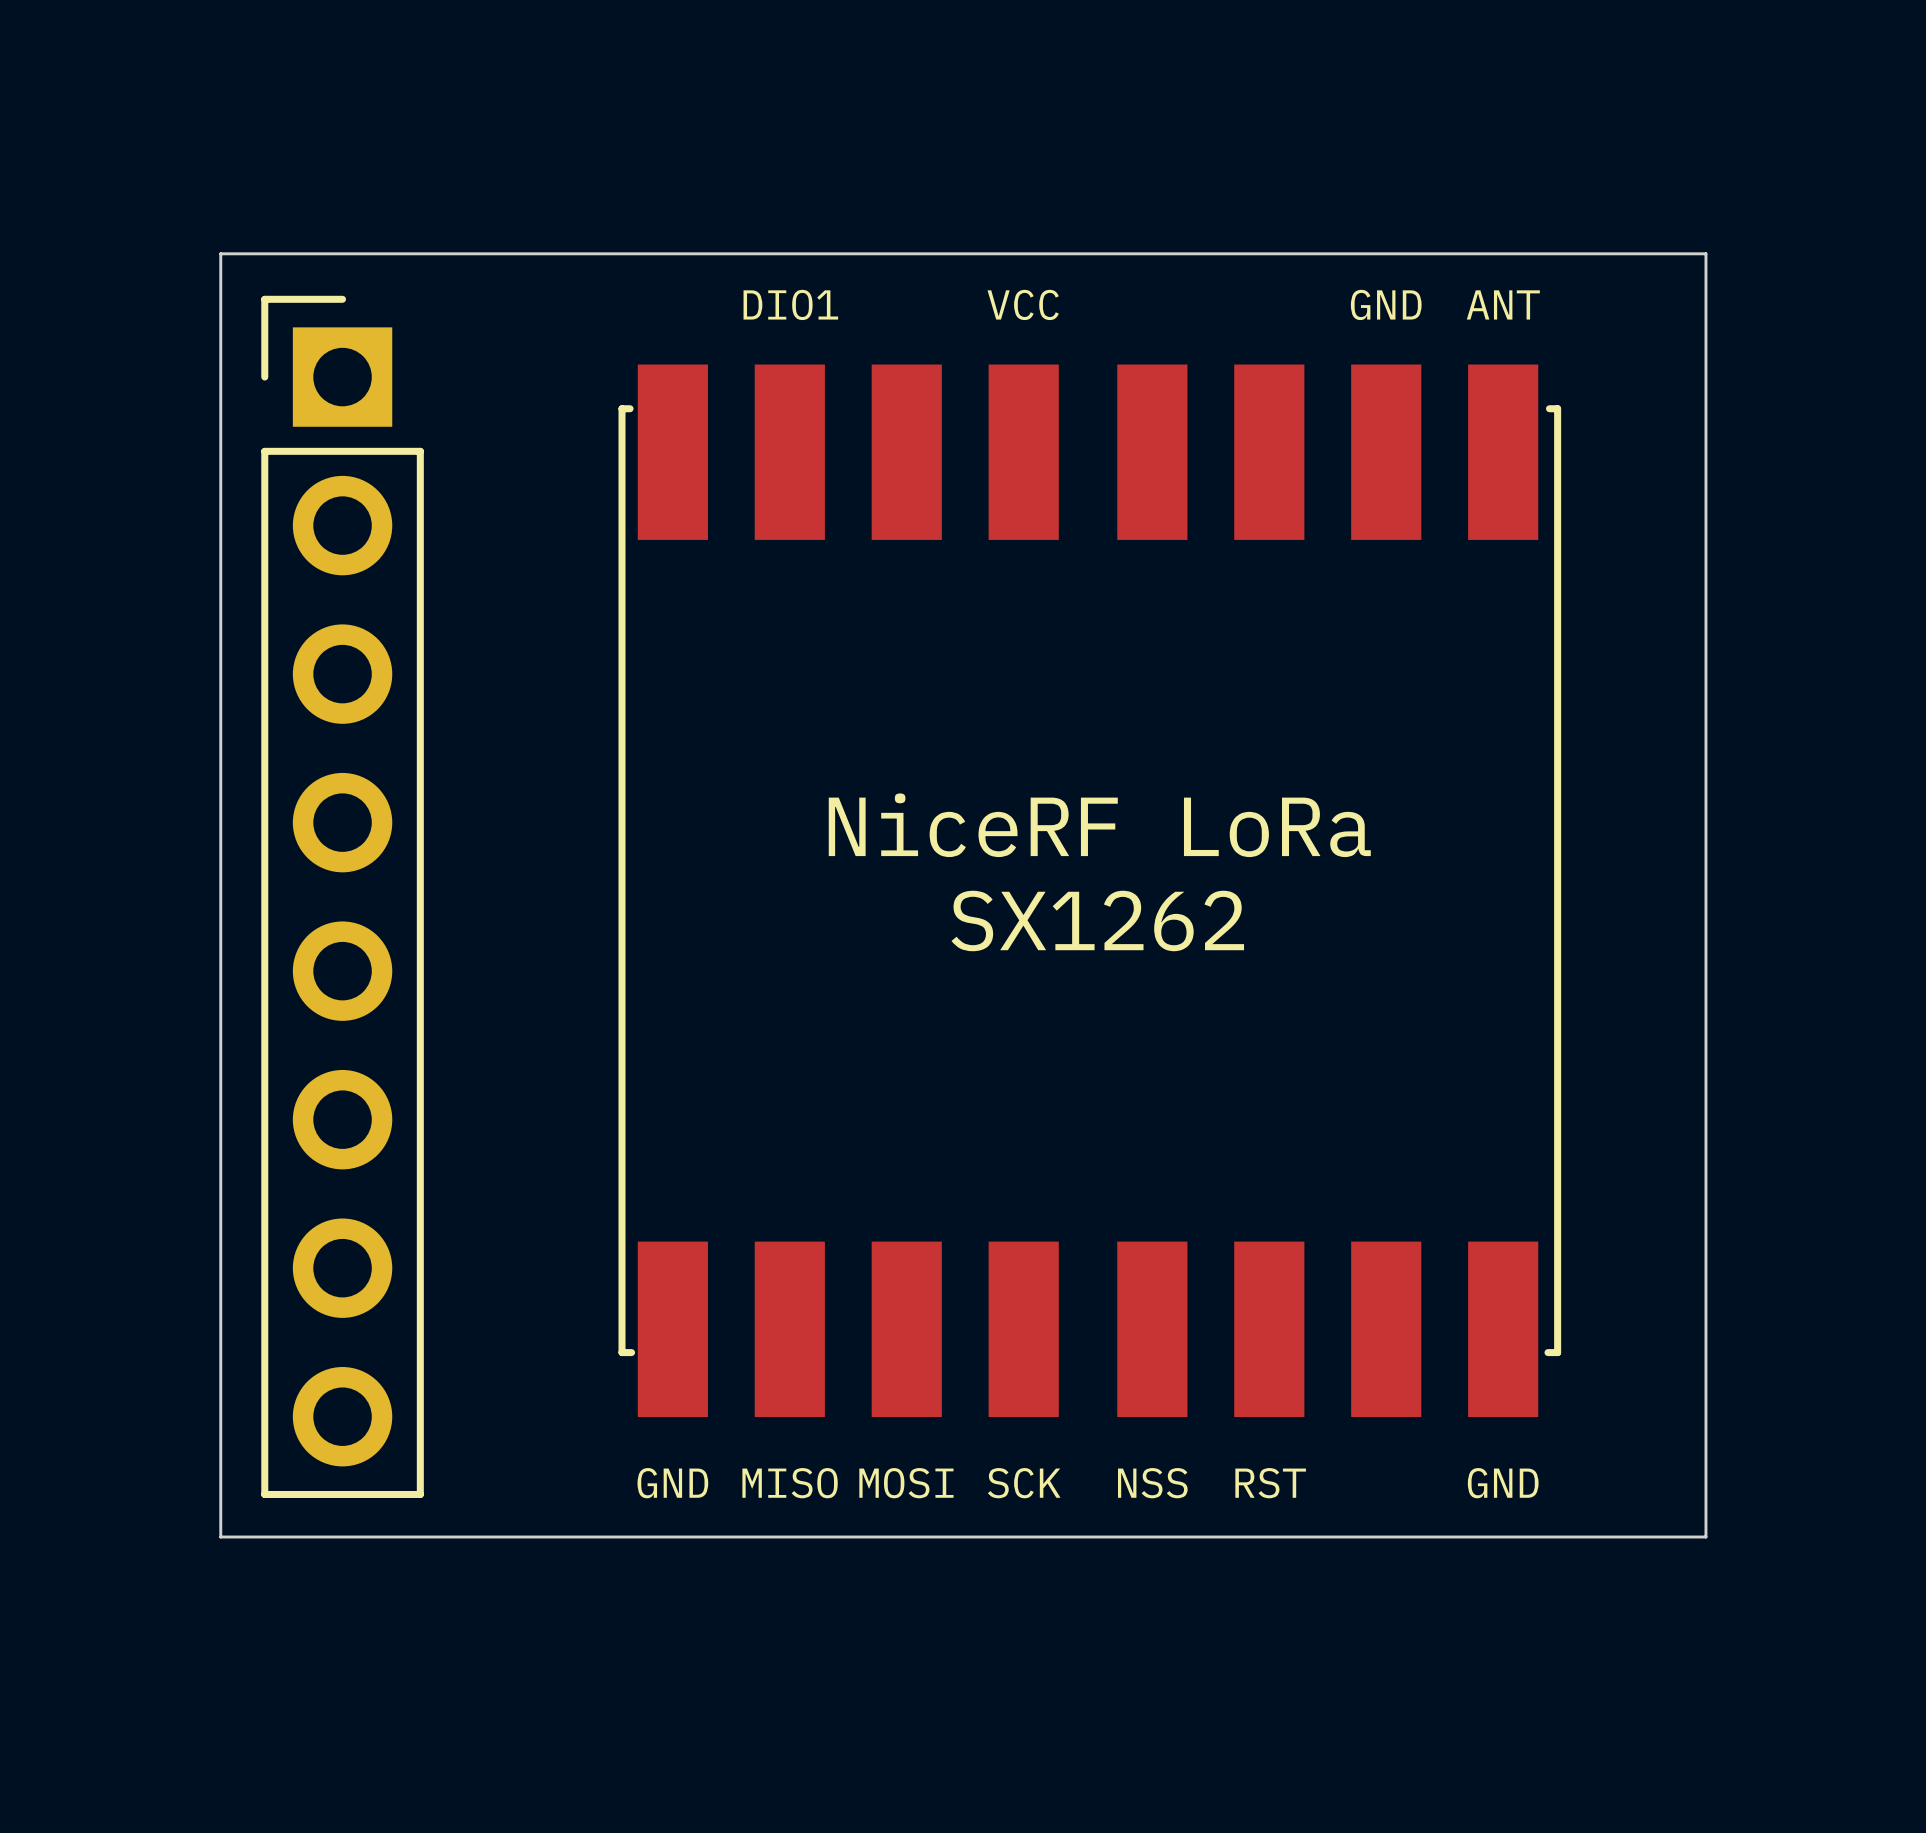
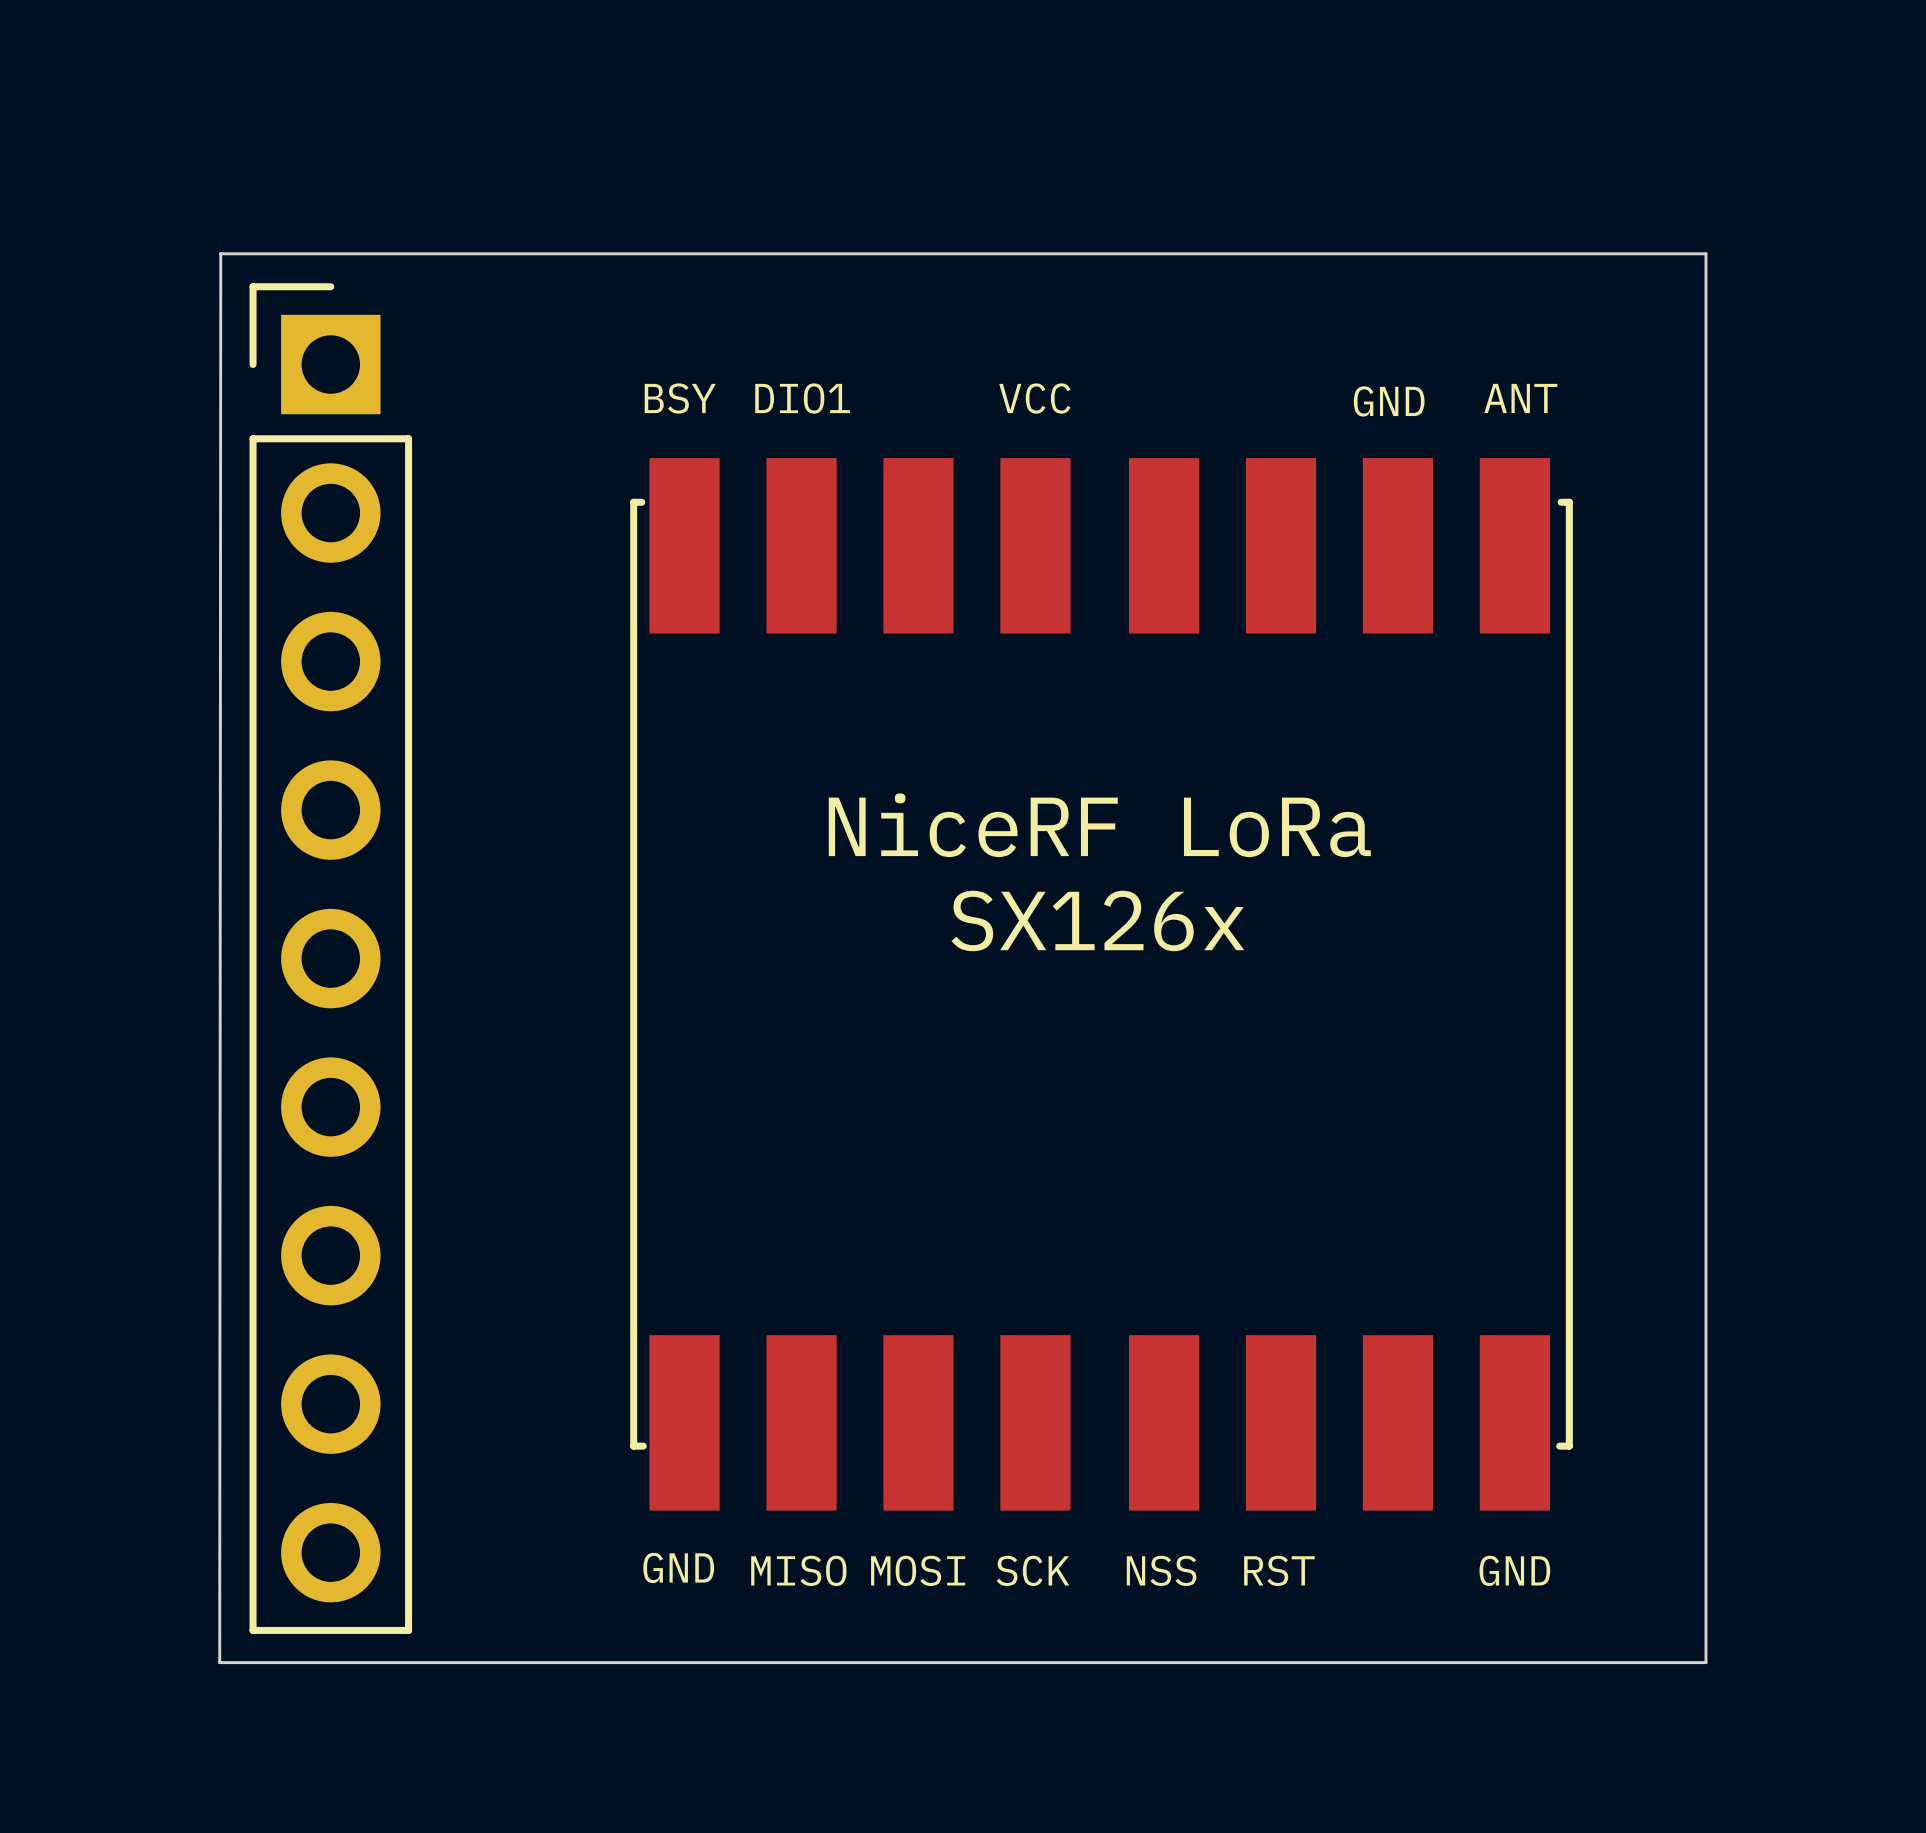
board edge: (220, 253) (220, 1537) (1705, 1537) -> (220, 253) (219, 1662) (1705, 1662) (1705, 1537)
text position: DIO1 (790, 304) -> DIO1 (802, 398)
text position: VCC (1023, 304) -> VCC (1034, 398)
text position: GND (1386, 304) -> GND (1389, 401)
text position: ANT (1503, 304) -> ANT (1520, 398)
text: none -> BSY (680, 398)
part position: (1089, 890) -> (1101, 984)
part: (342, 896) -> none
text: SX1262 (1097, 920) -> SX126x (1097, 920)
part: none -> (330, 958)
text position: GND (672, 1483) -> GND (678, 1567)
text position: MISO (790, 1483) -> MISO (798, 1570)
text position: MOSI (906, 1483) -> MOSI (918, 1570)
text position: SCK (1024, 1483) -> SCK (1032, 1570)
text position: NSS (1152, 1483) -> NSS (1161, 1570)
text position: RST (1270, 1483) -> RST (1279, 1570)
text position: GND (1503, 1483) -> GND (1514, 1570)

